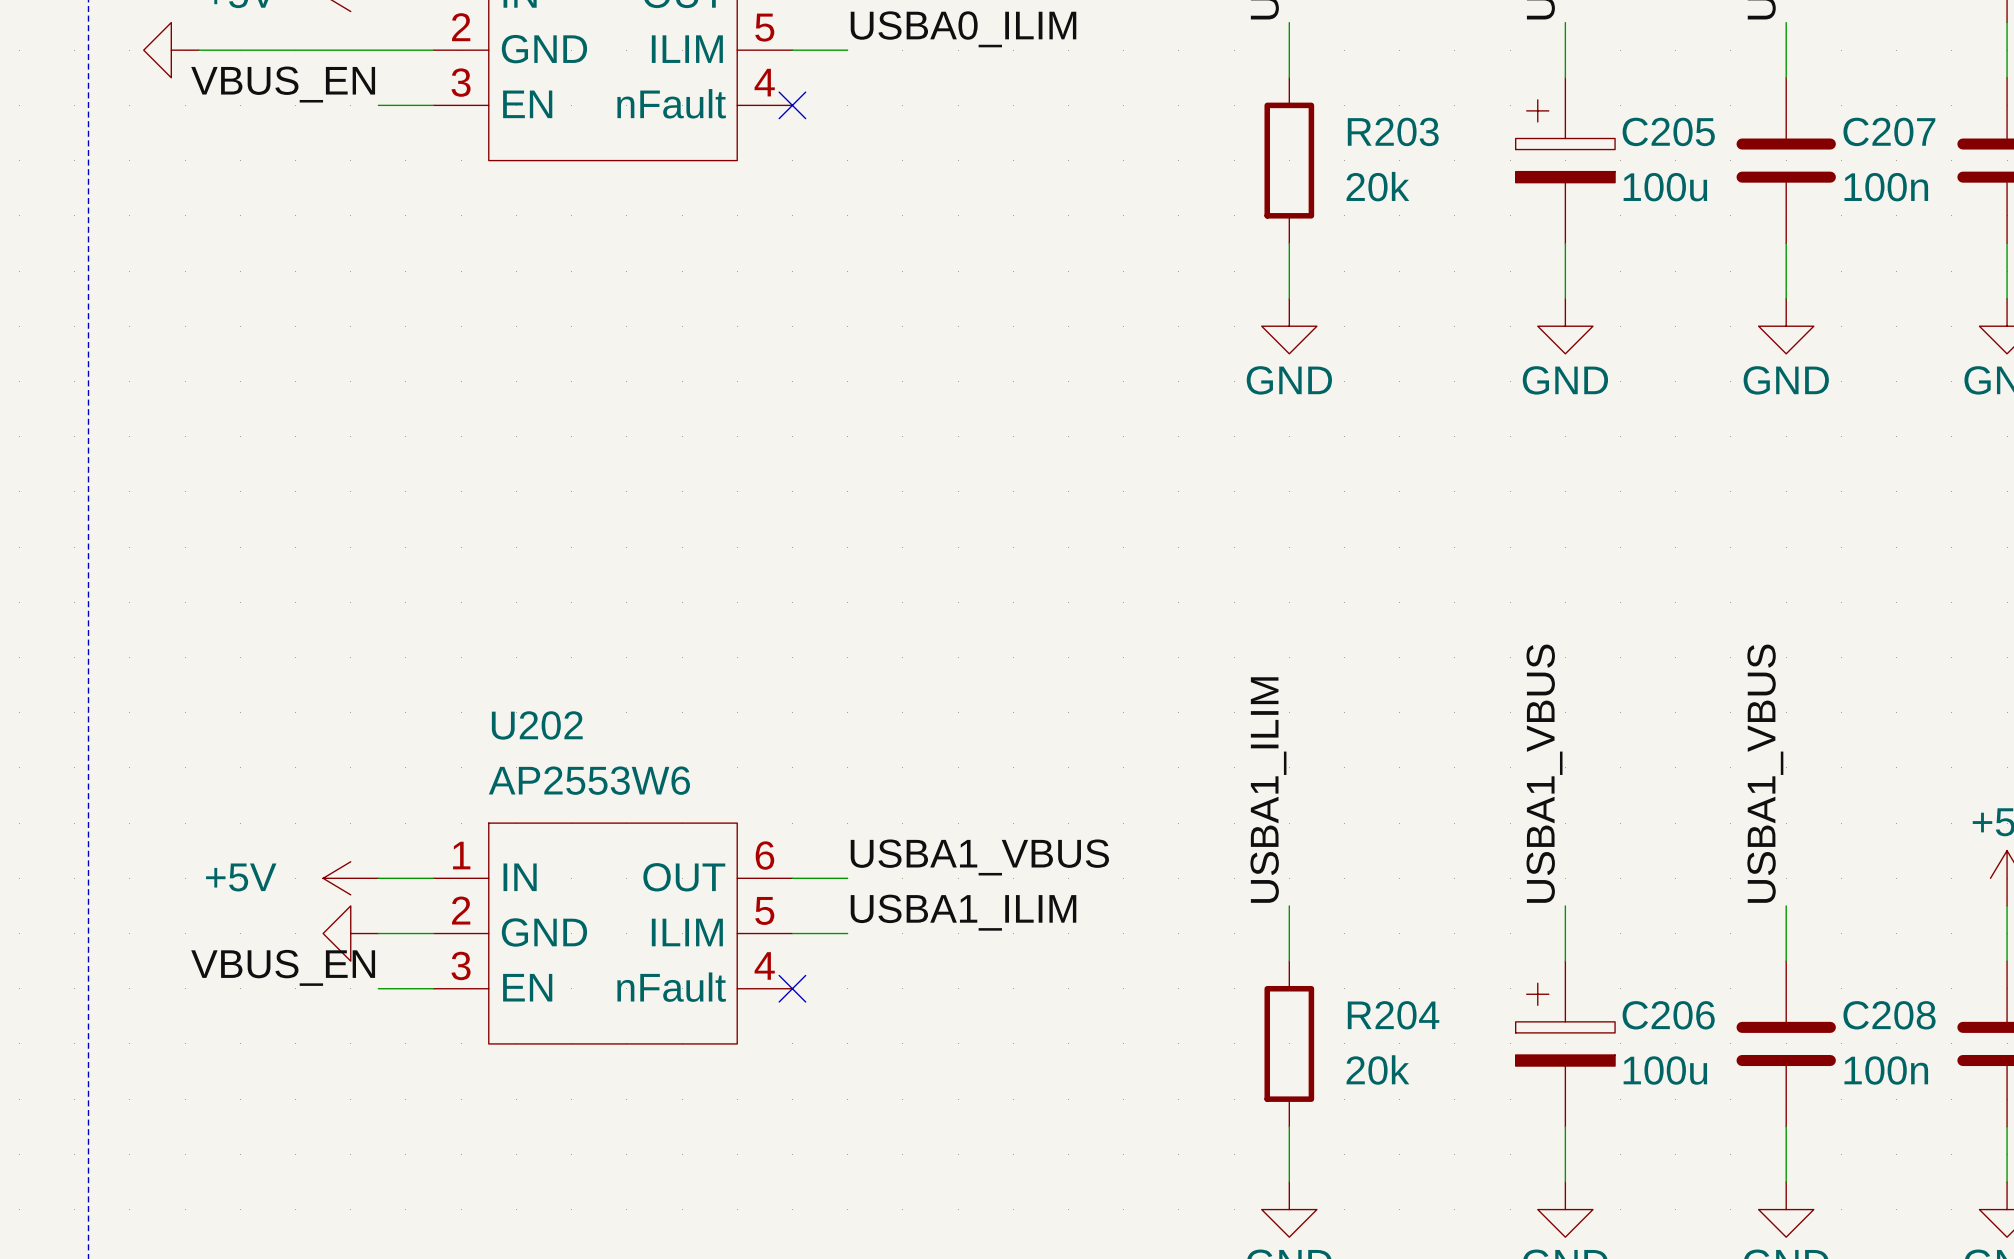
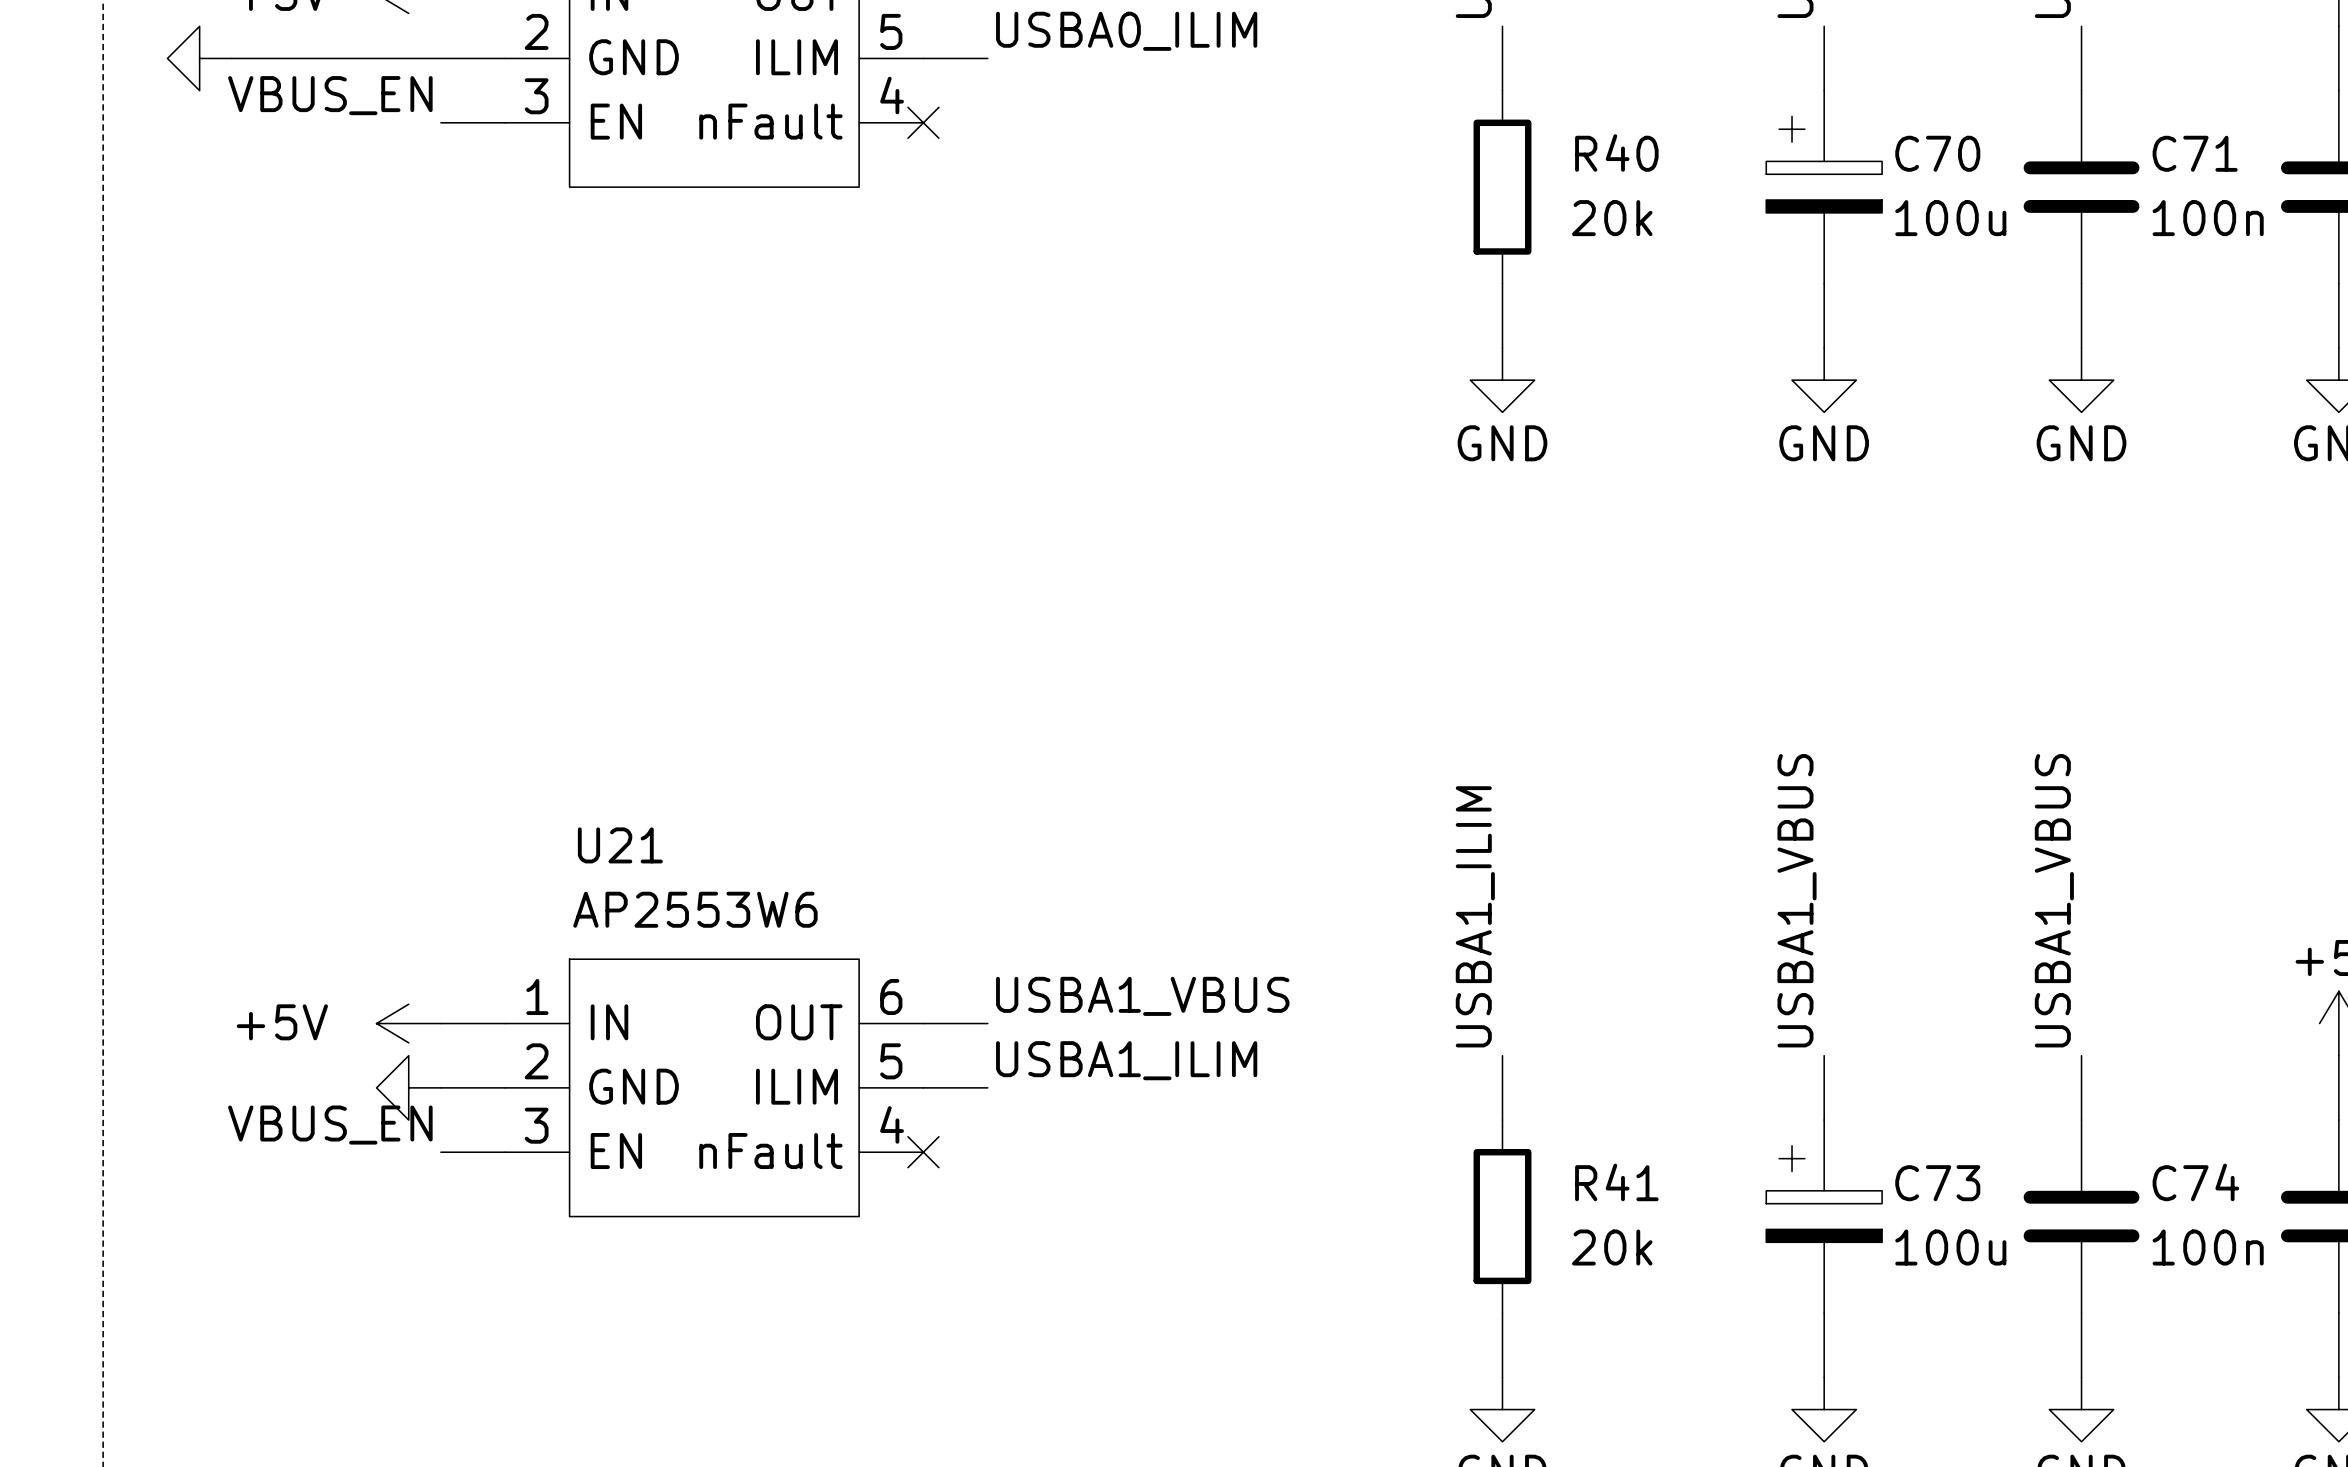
R203 name: R203 (1393, 131) -> R40 (1616, 153)
C205 name: C205 (1668, 131) -> C70 (1937, 153)
C207 name: C207 (1889, 131) -> C71 (2195, 153)
U202 name: U202 (537, 725) -> U21 (620, 845)
R204 name: R204 (1393, 1015) -> R41 (1616, 1182)
C206 name: C206 (1668, 1015) -> C73 (1937, 1183)
C208 name: C208 (1889, 1015) -> C74 (2195, 1182)

